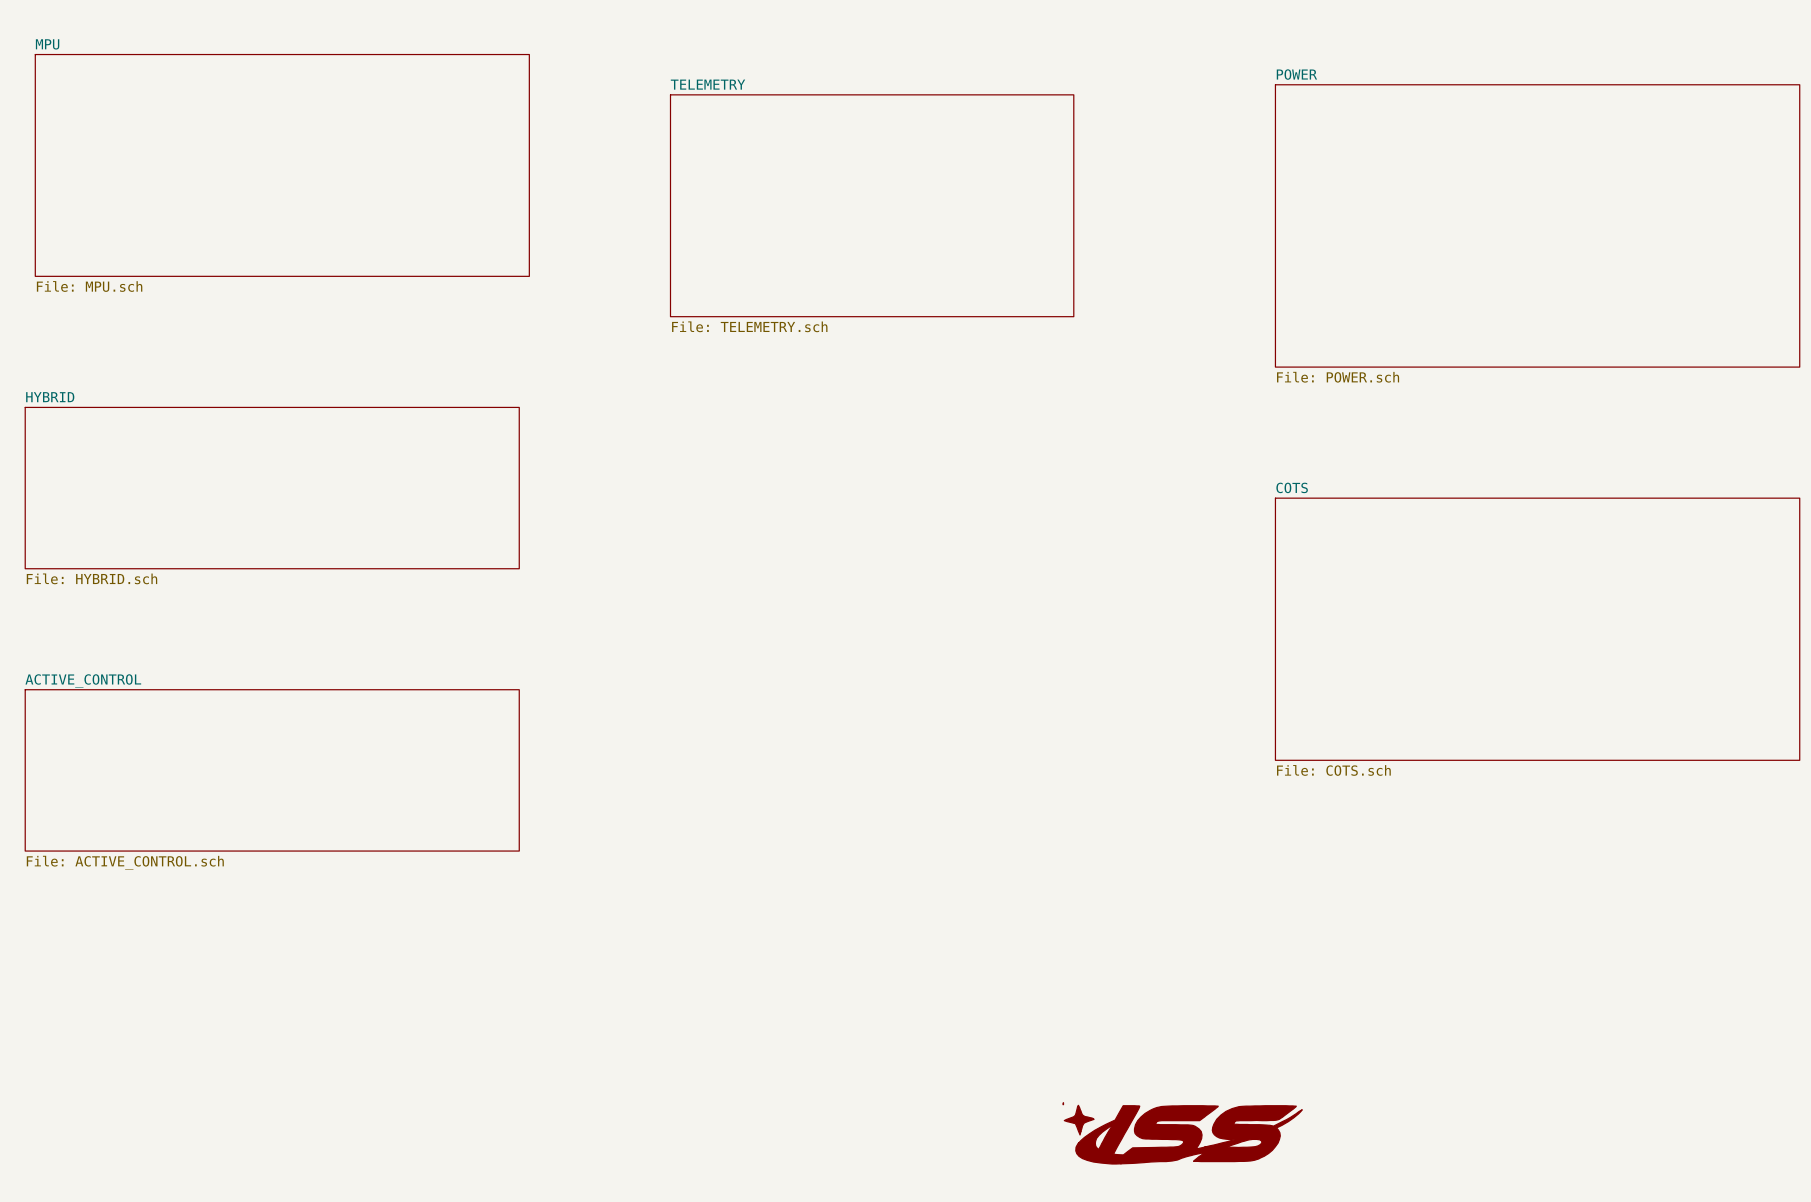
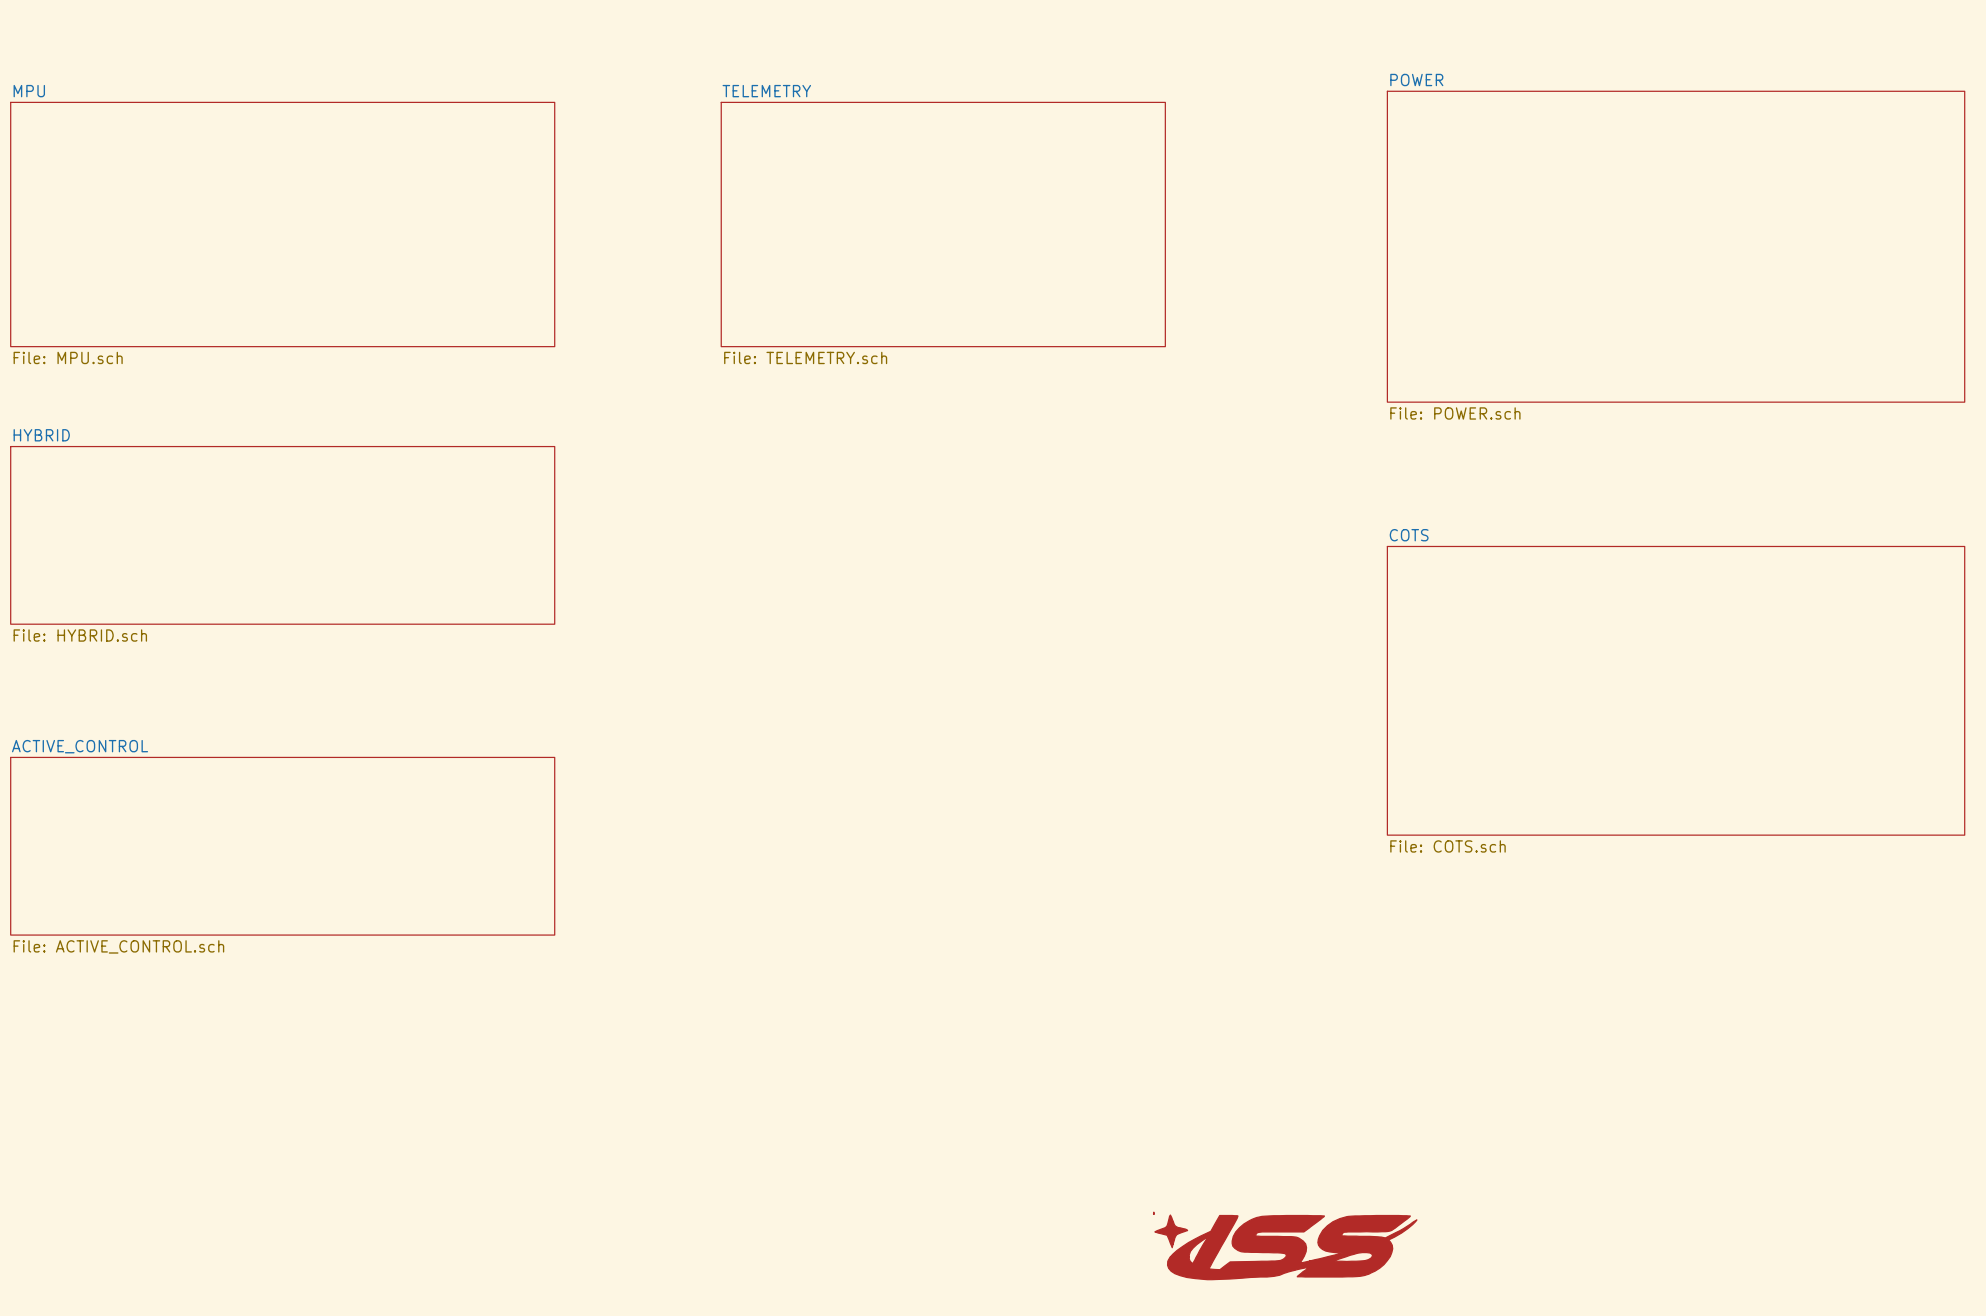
sheet MPU position: (282, 165) -> (282, 224)

